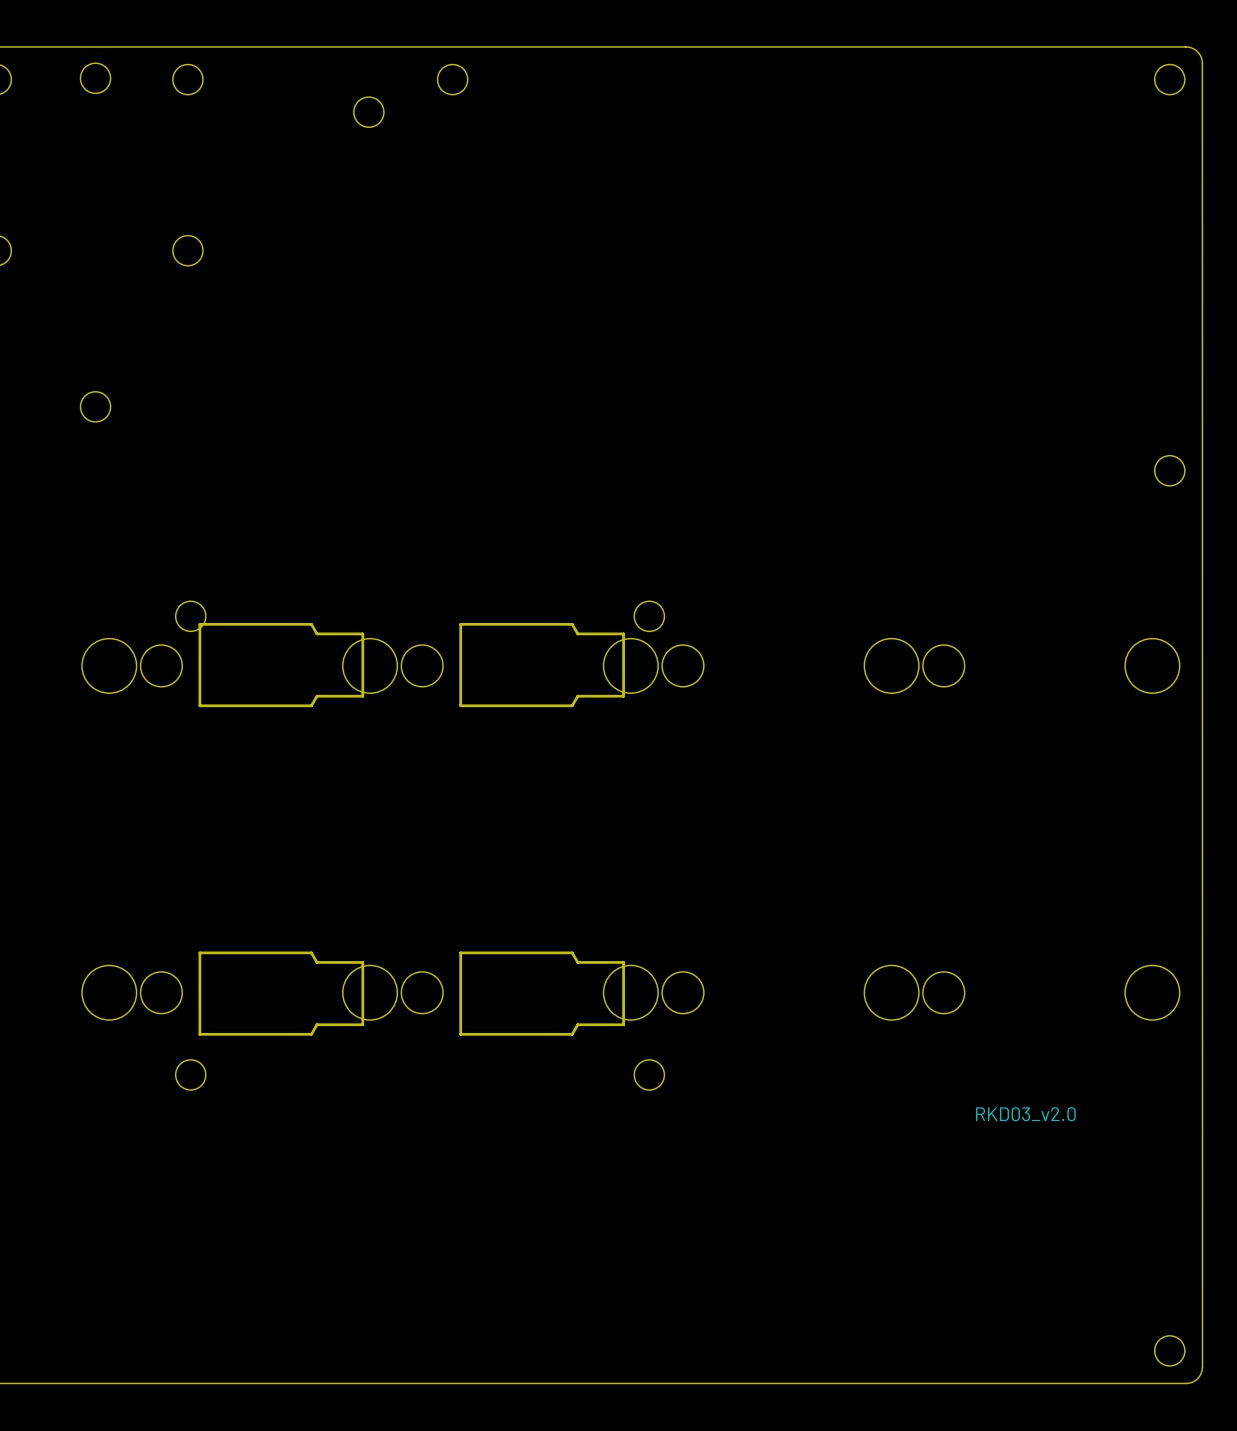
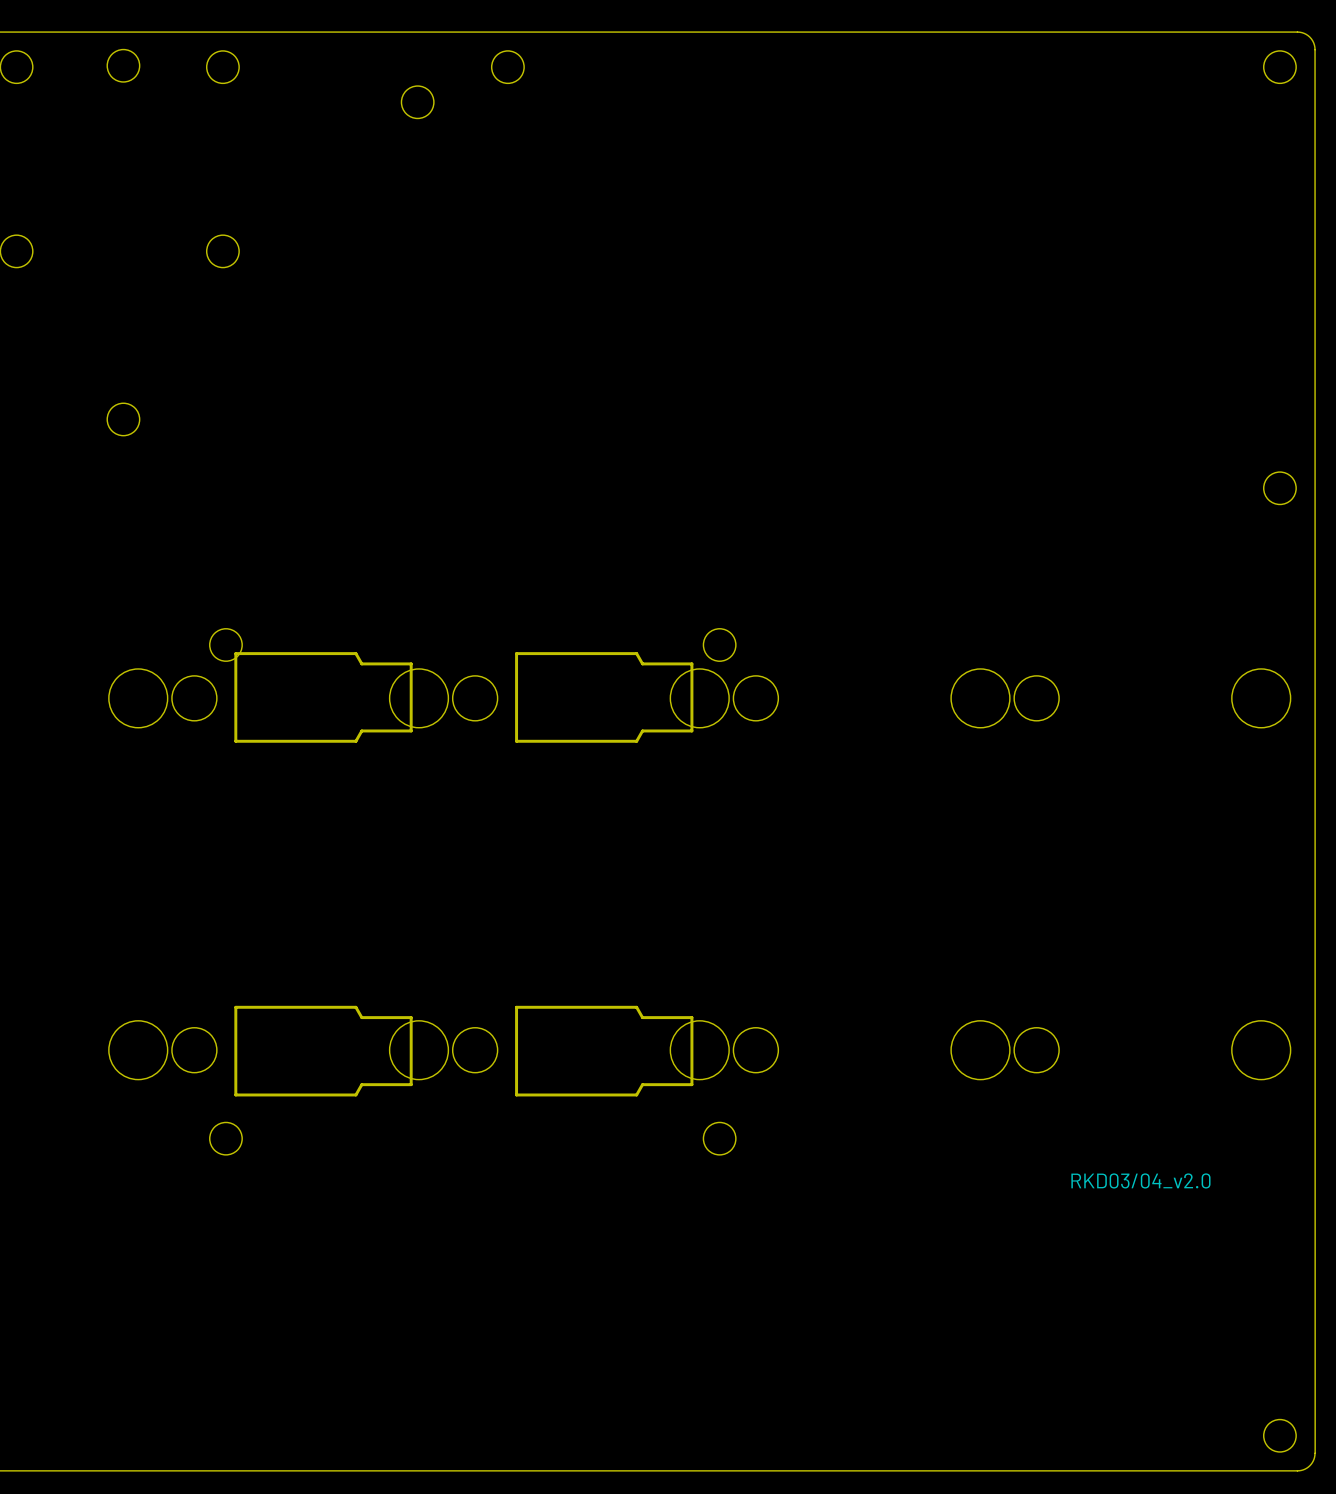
text: RKD03_v2.0 (1025, 1114) -> RKD03/04_v2.0 (1140, 1180)

